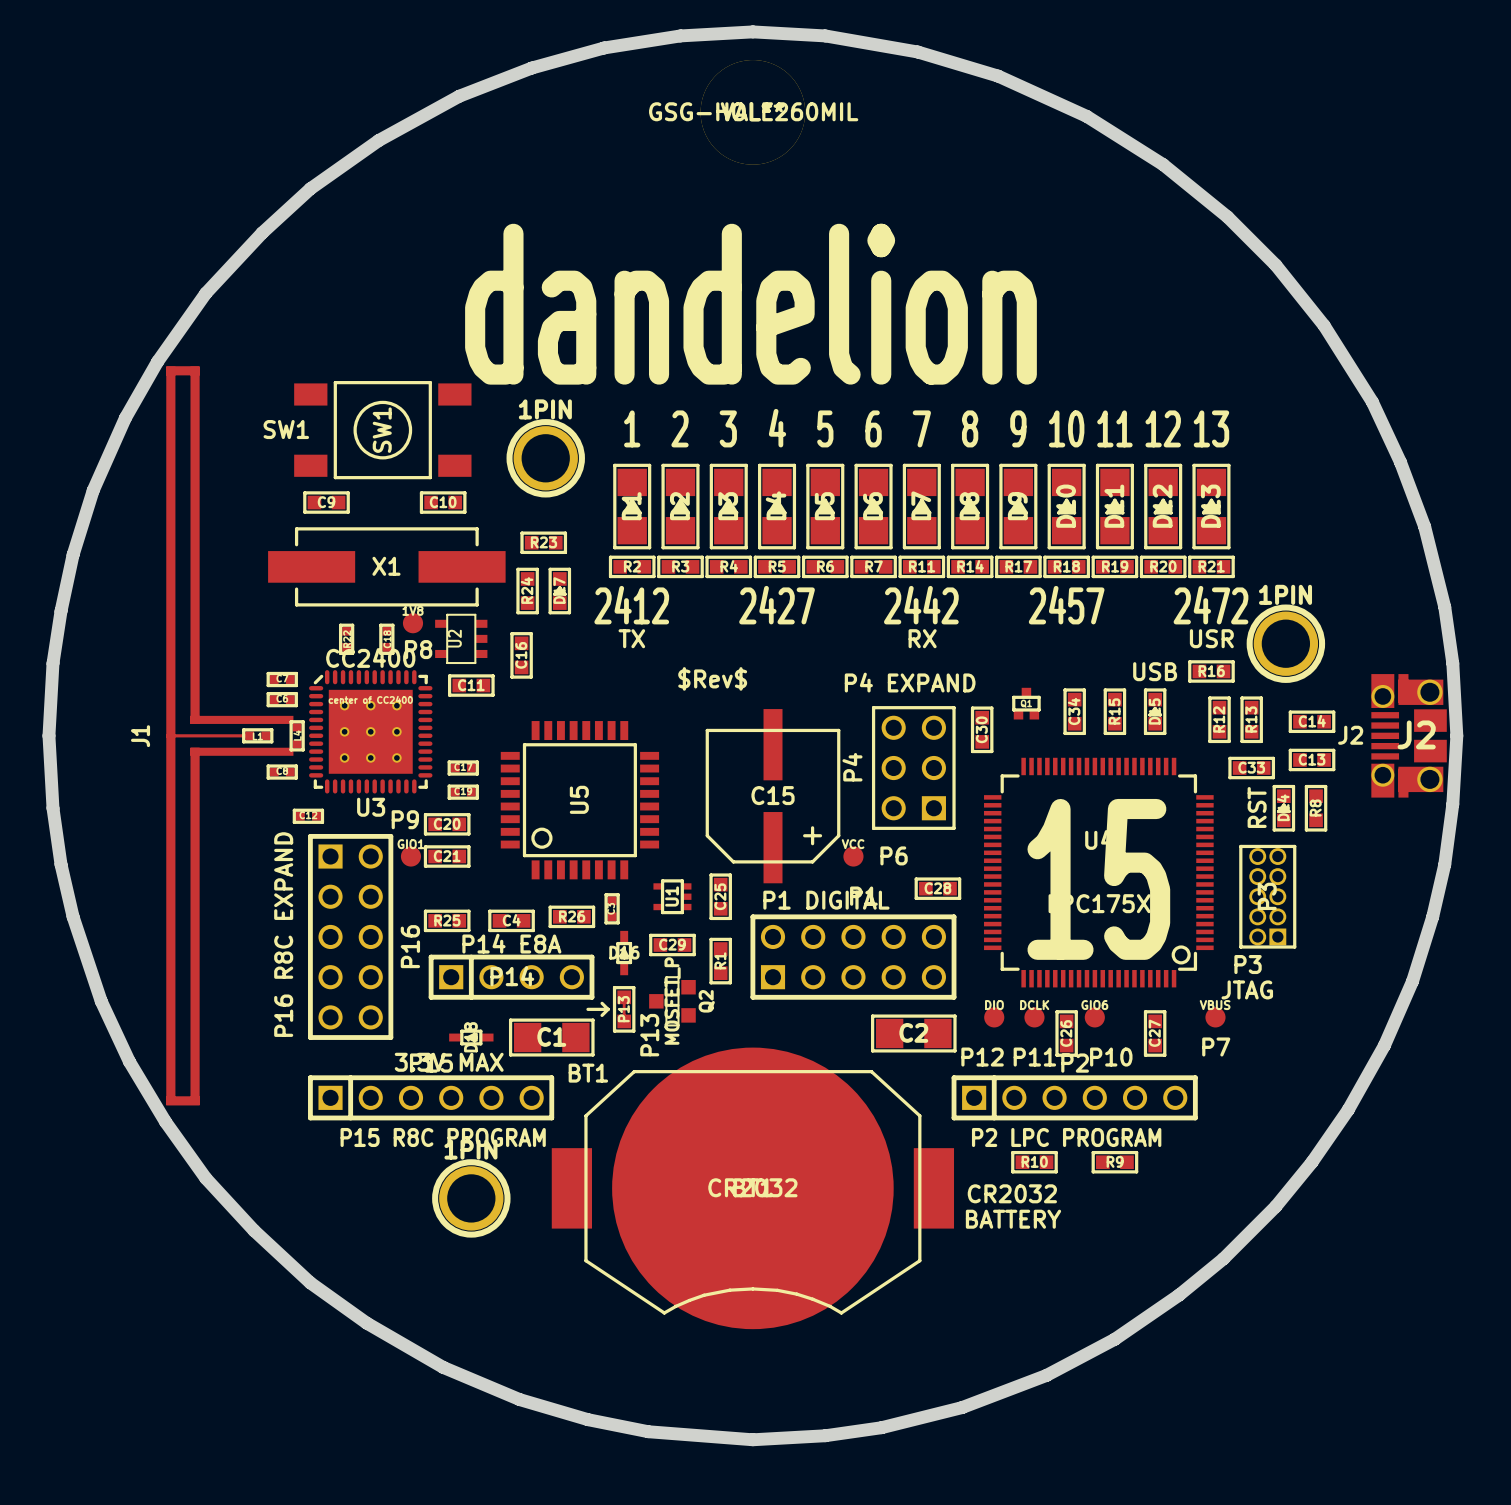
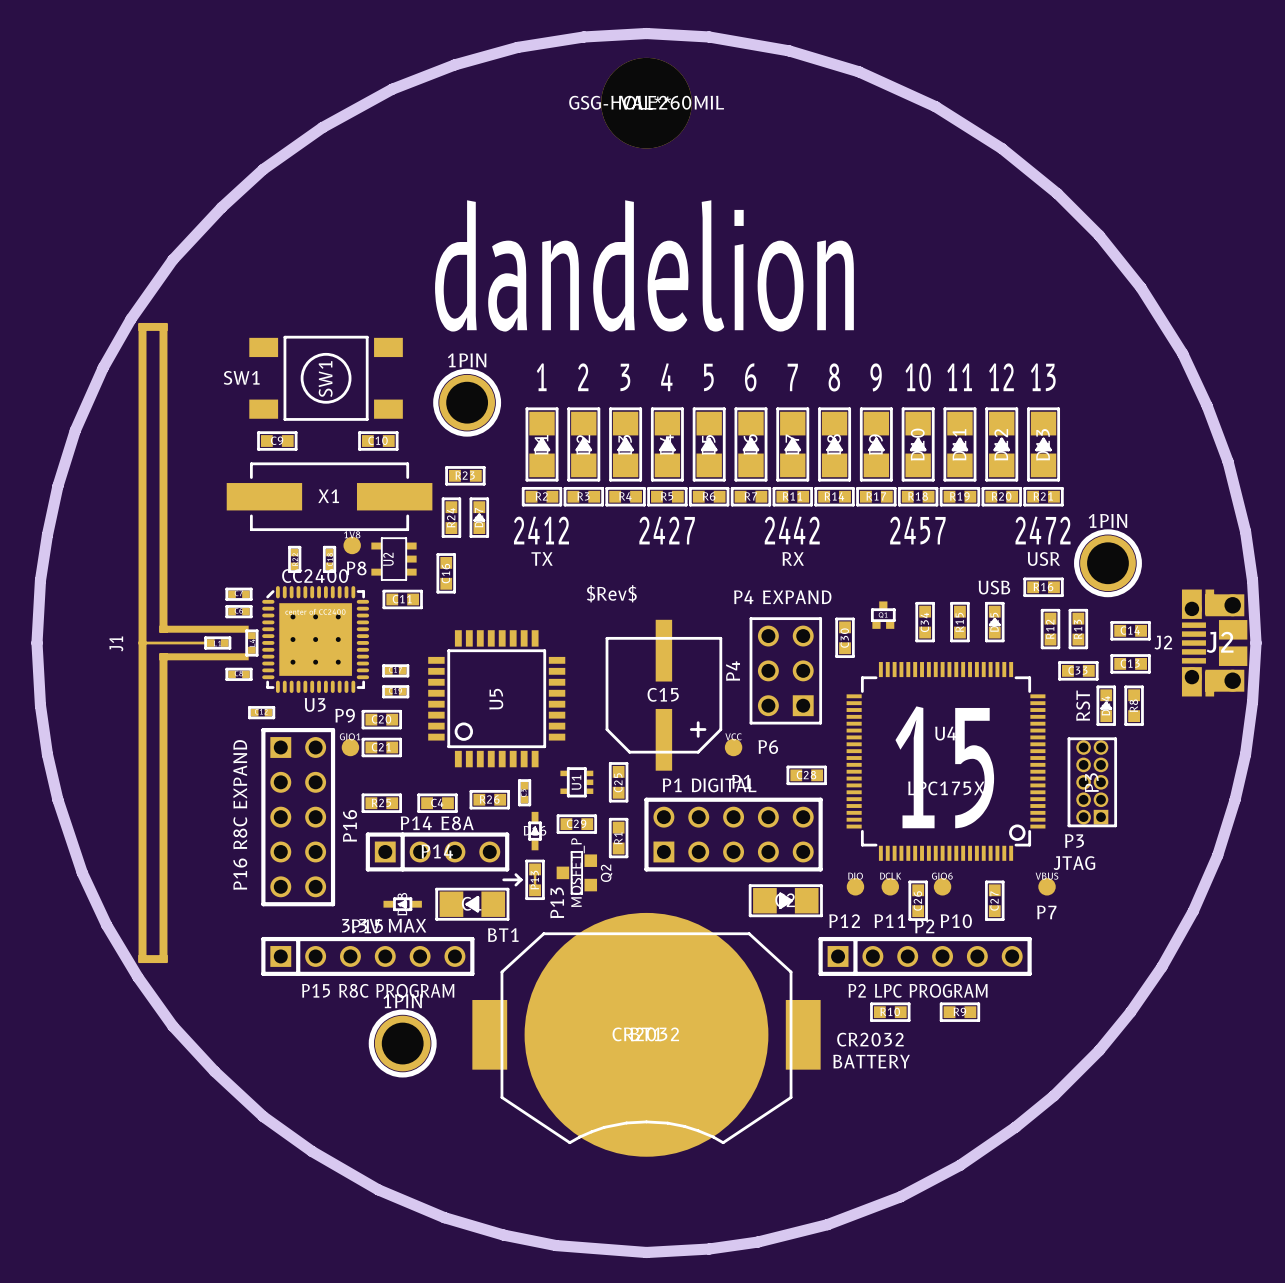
C2 footprint: [871, 1014, 957, 1053] -> [748, 884, 823, 918]
C1 footprint: [508, 1018, 595, 1057] -> [435, 887, 510, 921]

